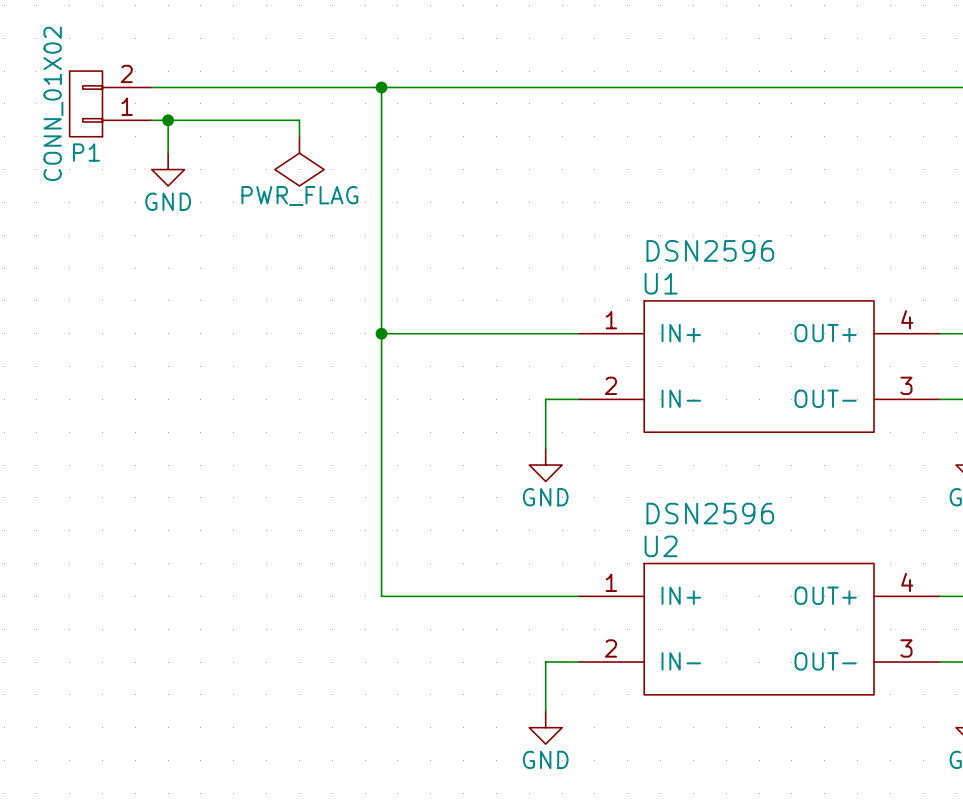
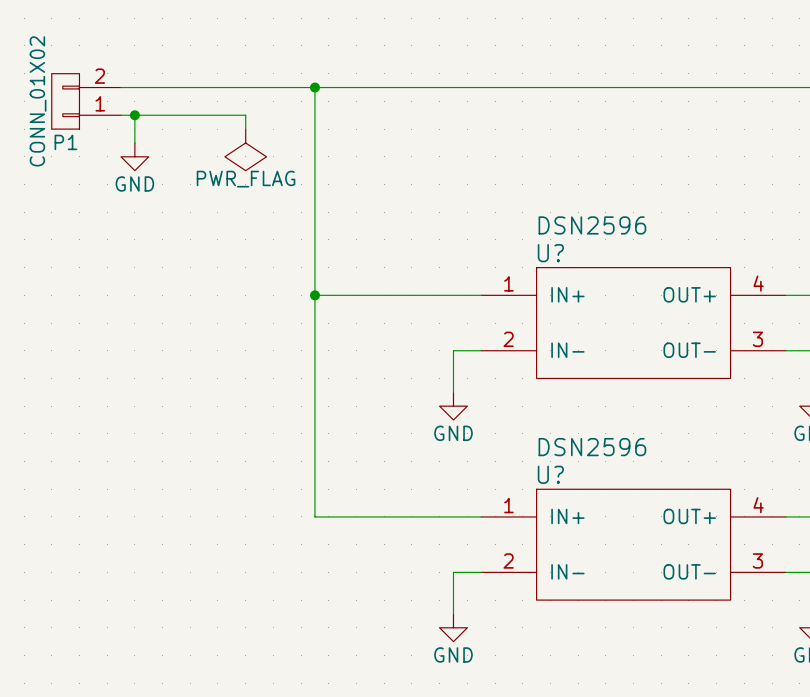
U1 name: U1 (661, 283) -> U? (550, 253)
U2 name: U2 (661, 546) -> U? (550, 474)

